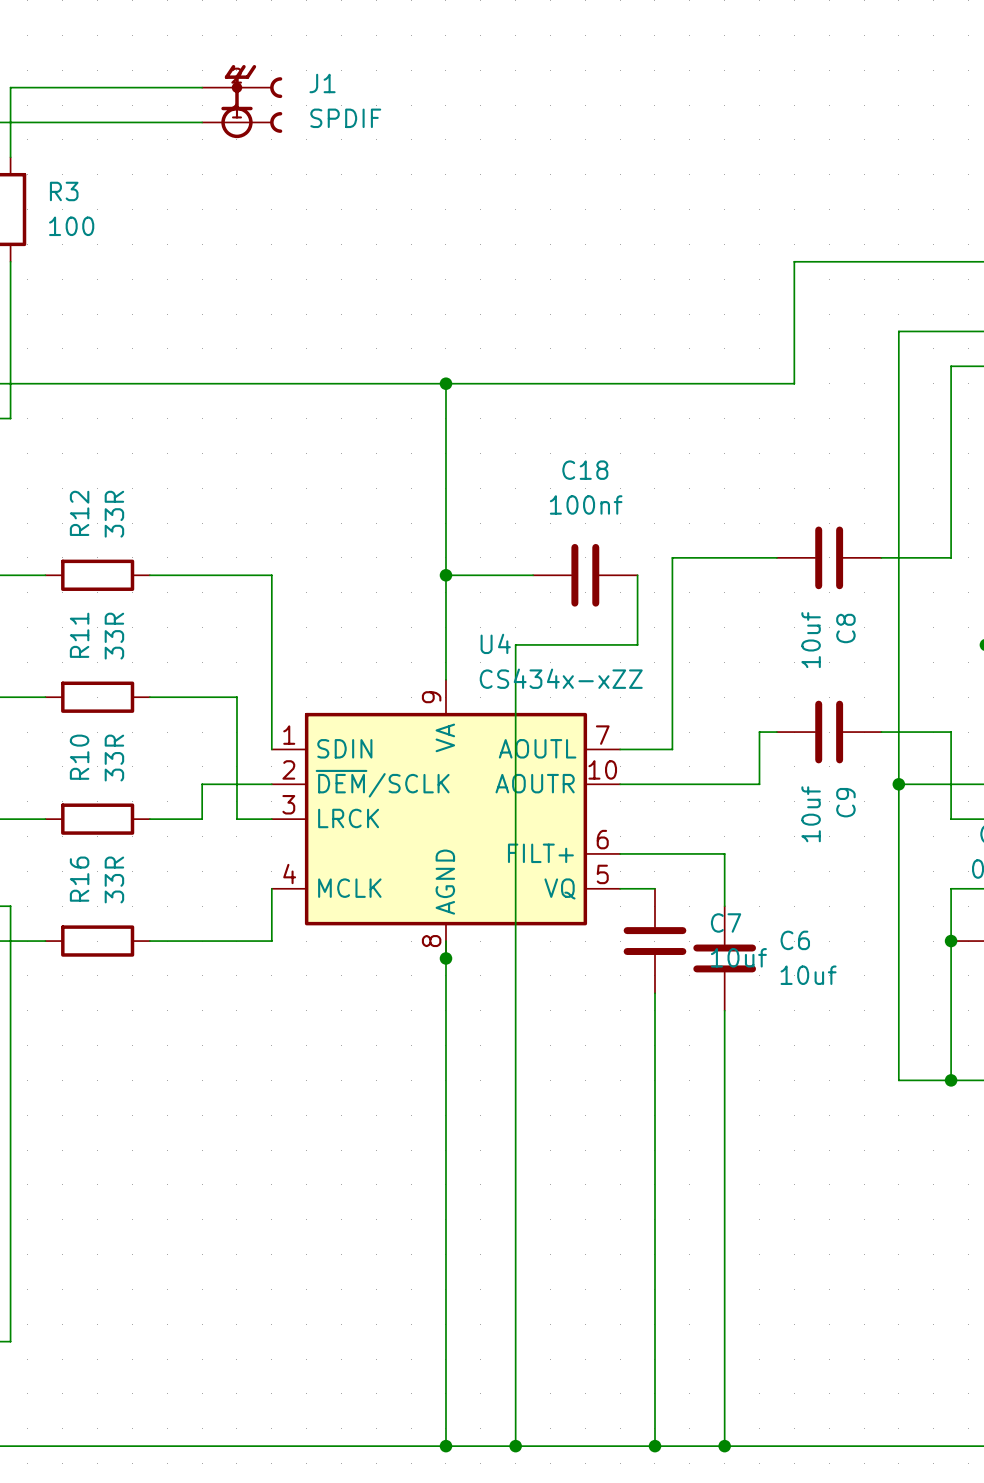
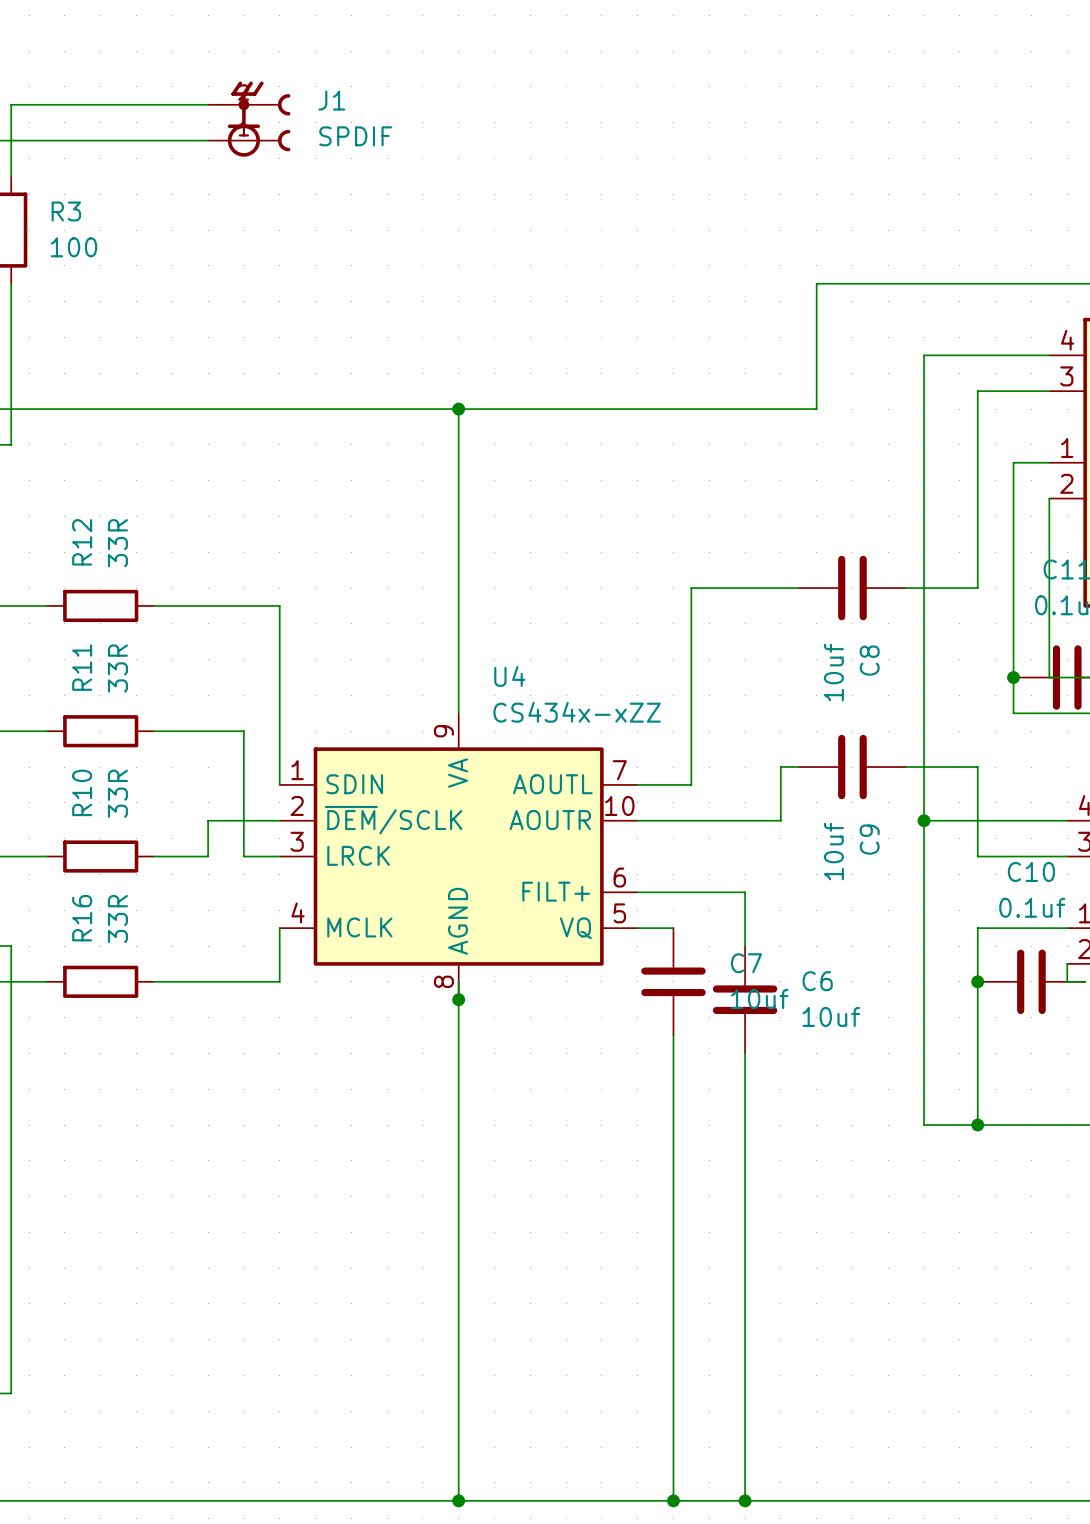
wire: (445, 575) (533, 575) -> none
junction: (445, 575) -> none
C18: 100nf (585, 575) -> none
wire: (637, 575) (637, 644) (515, 644) (515, 1446) -> none
junction: (515, 1446) -> none

